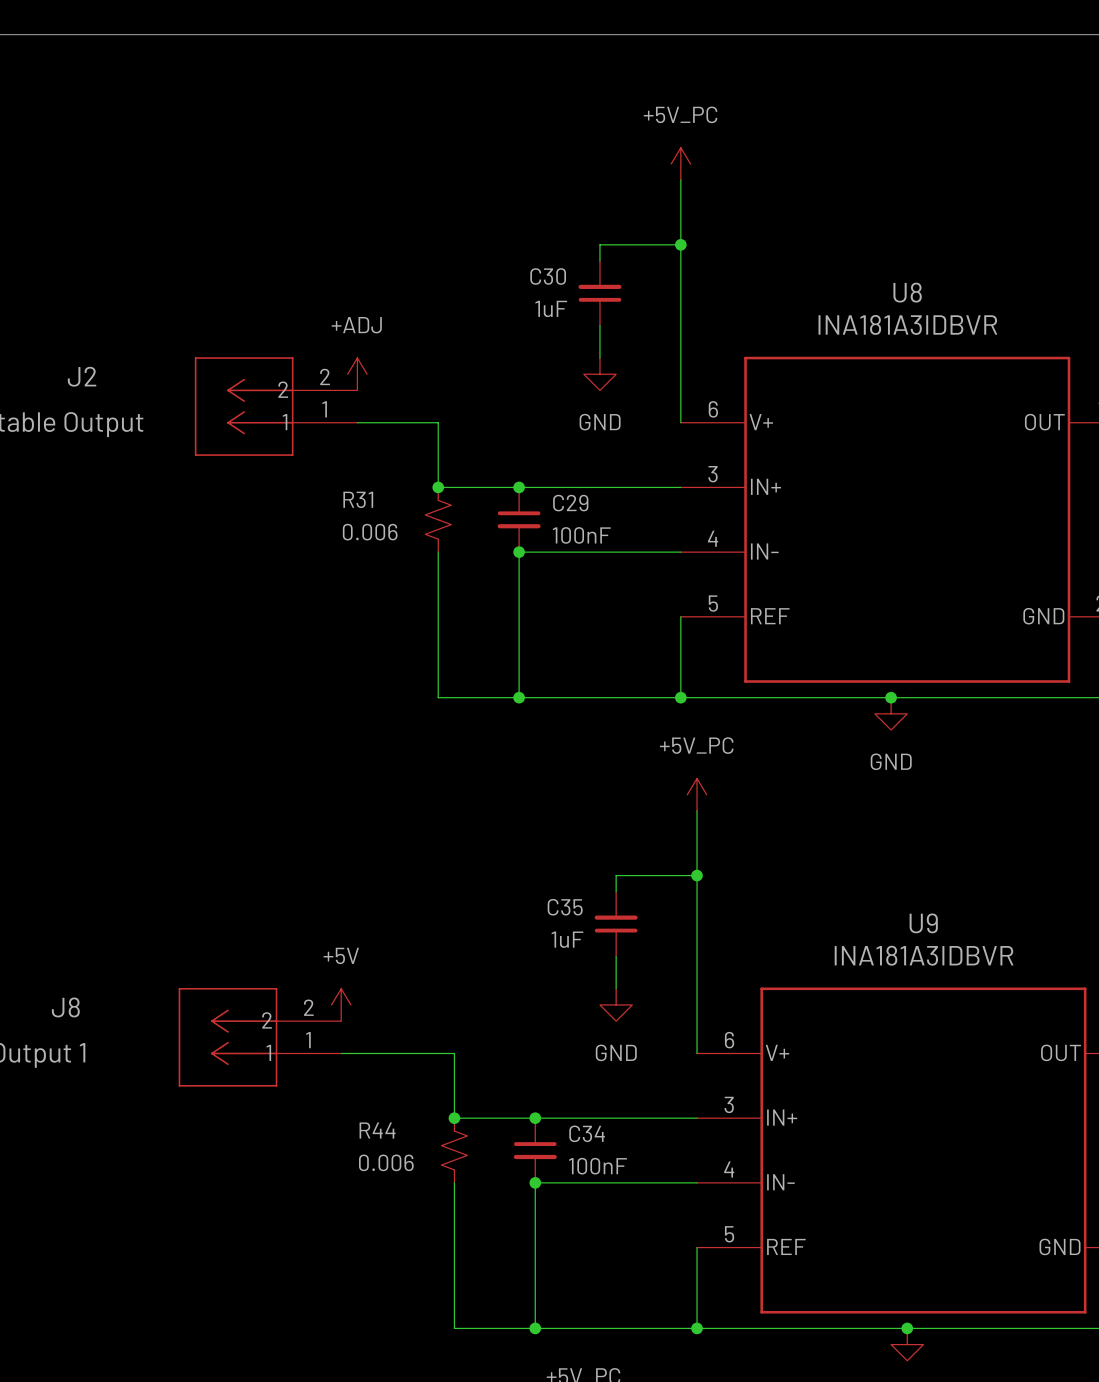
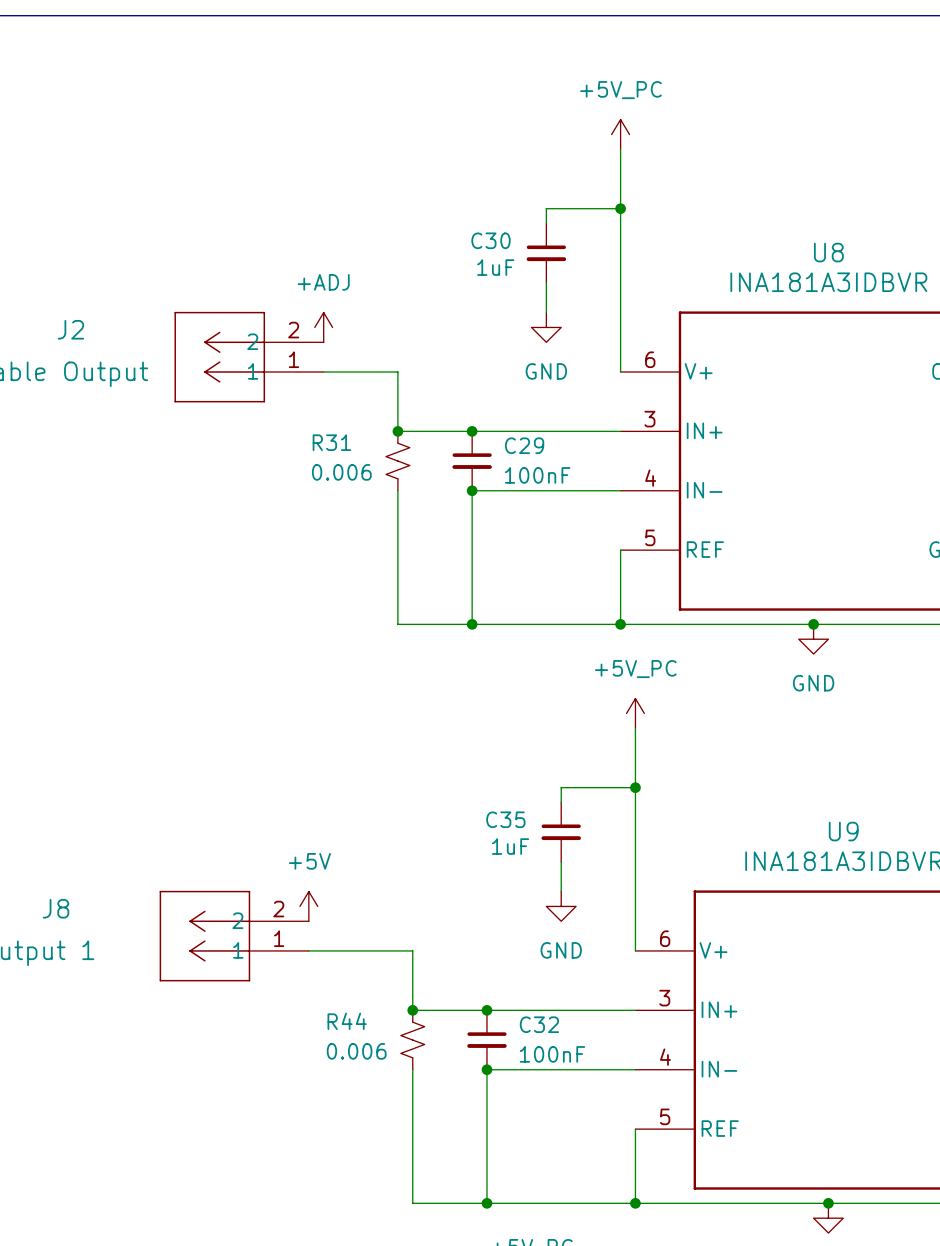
C30 rotation: 0° (599, 293) -> 180° (546, 253)
C35 rotation: 0° (616, 924) -> 180° (561, 832)
C34 name: C34 (587, 1133) -> C32 (539, 1024)

